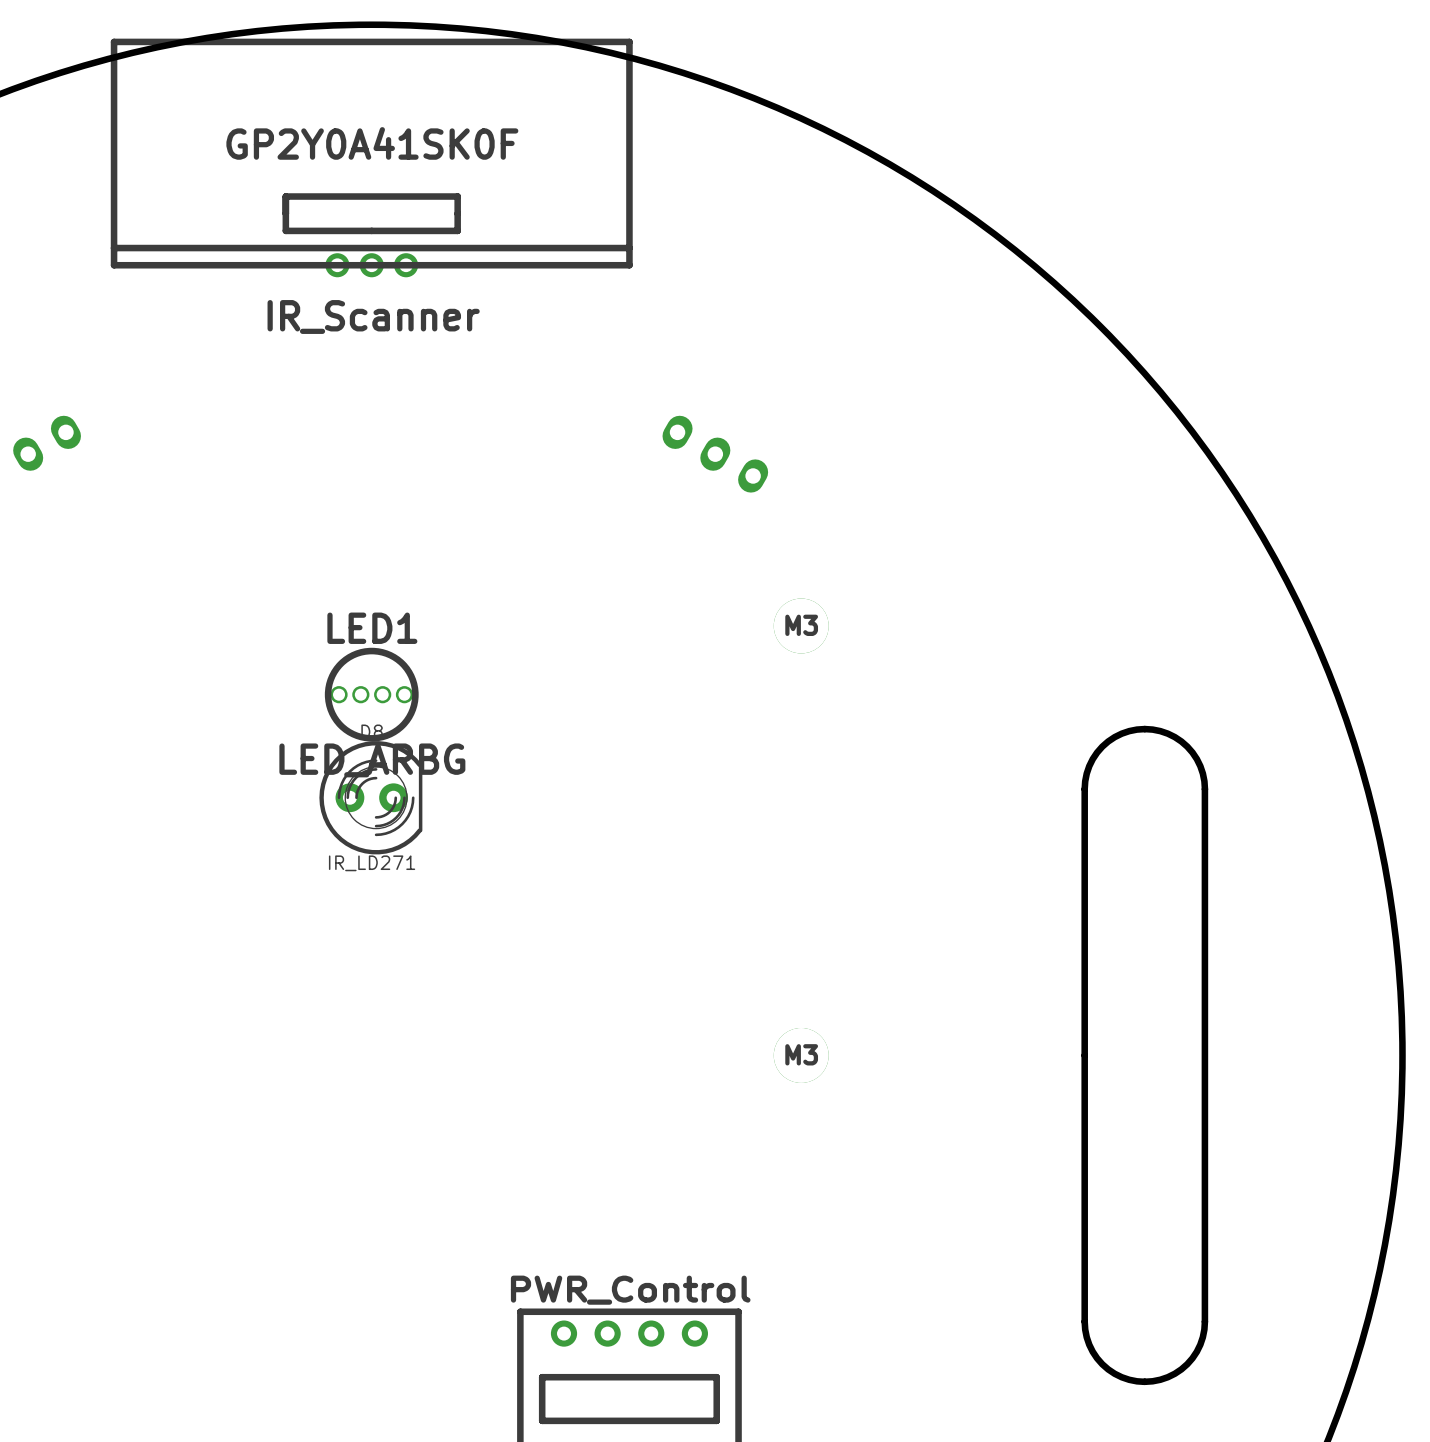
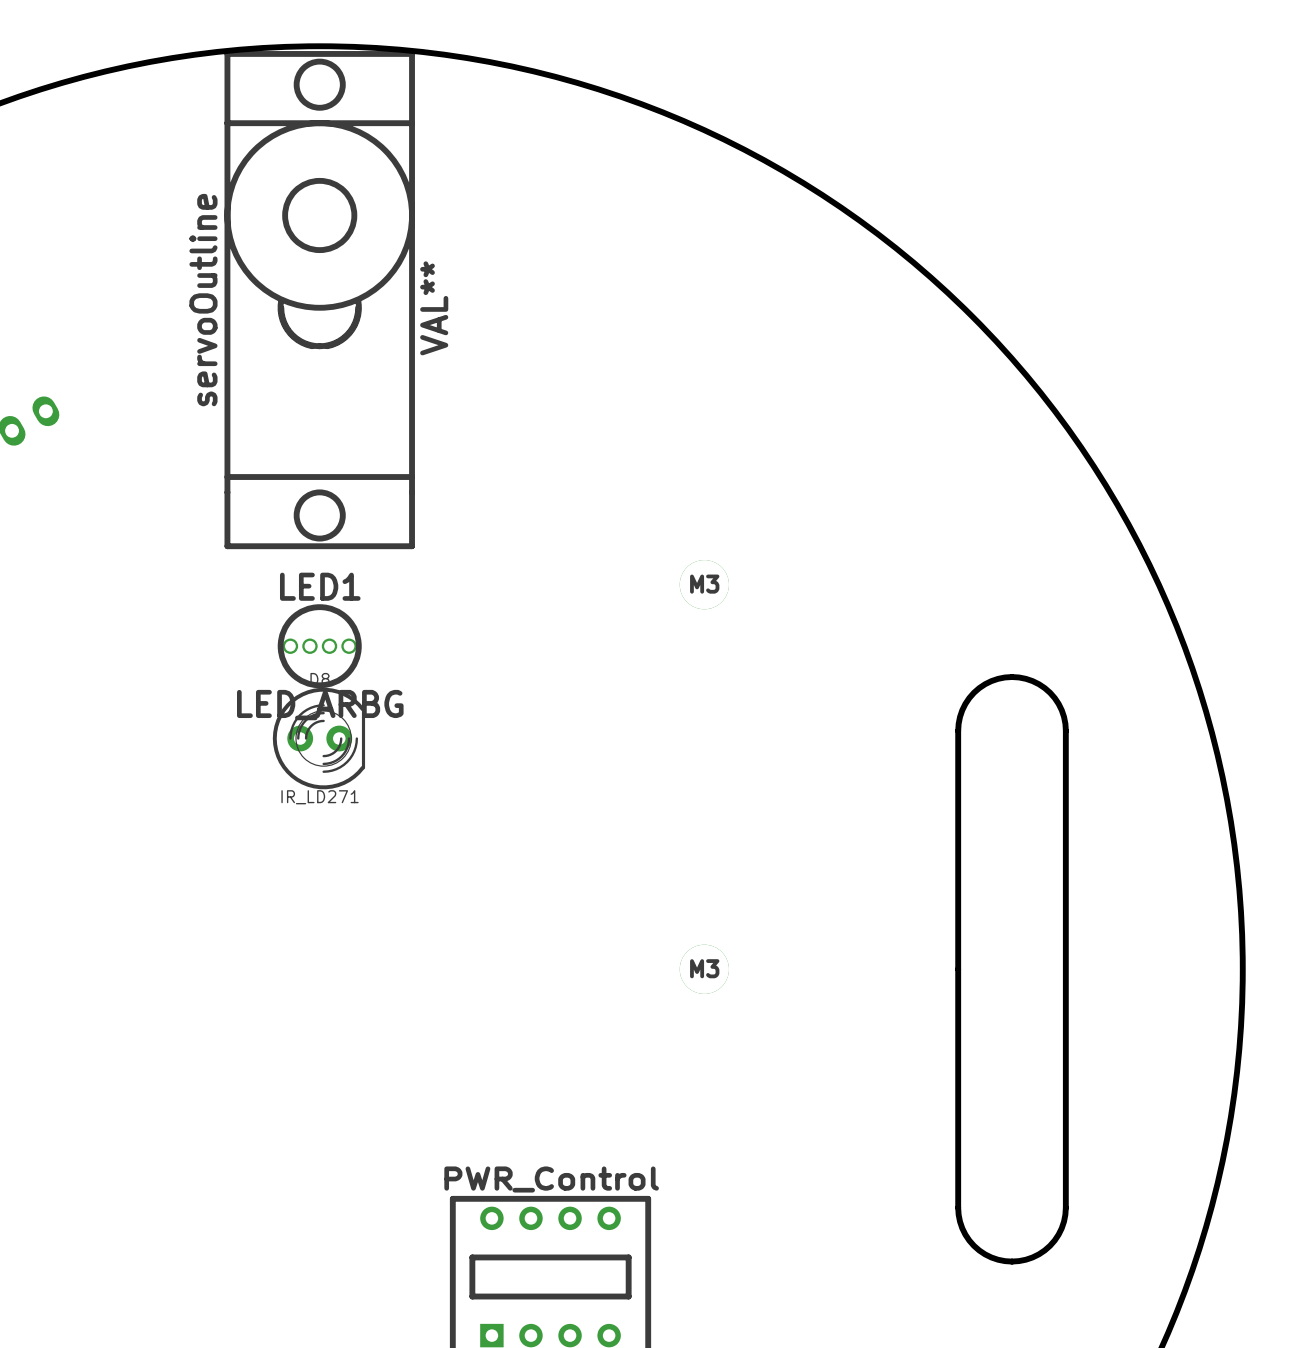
GP2Y0A41SK0F: IR_Scanner (371, 157) -> none
servoOutline: none -> VAL** (319, 300)
part: (715, 454) -> none

